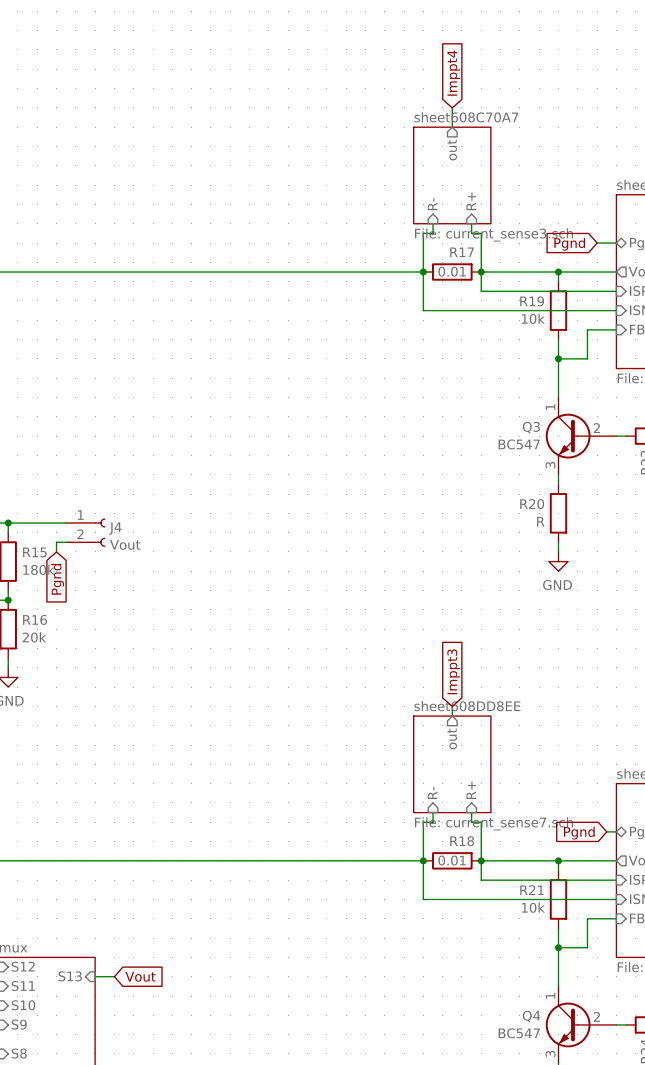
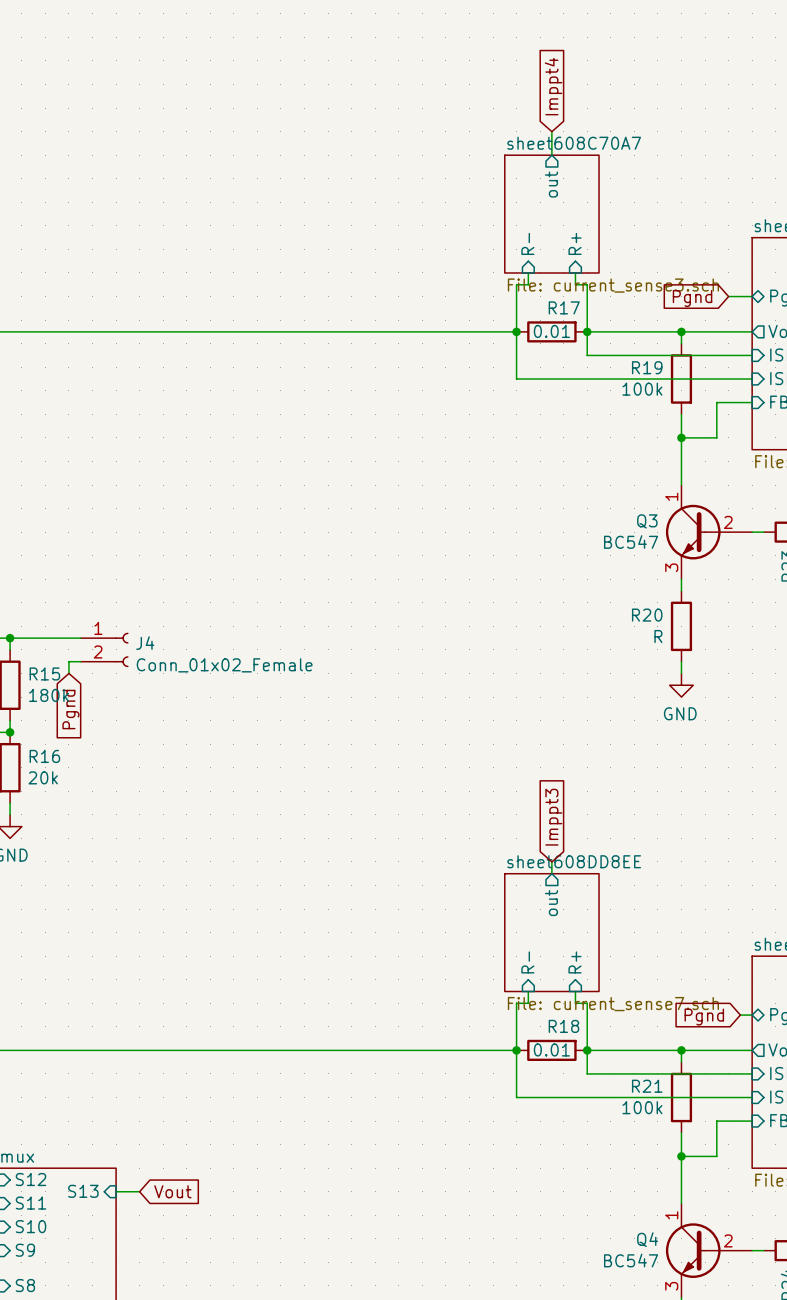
R19 value: 10k (533, 318) -> 100k (642, 389)
J4 value: Vout (125, 544) -> Conn_01x02_Female (224, 665)
R21 value: 10k (533, 907) -> 100k (642, 1107)

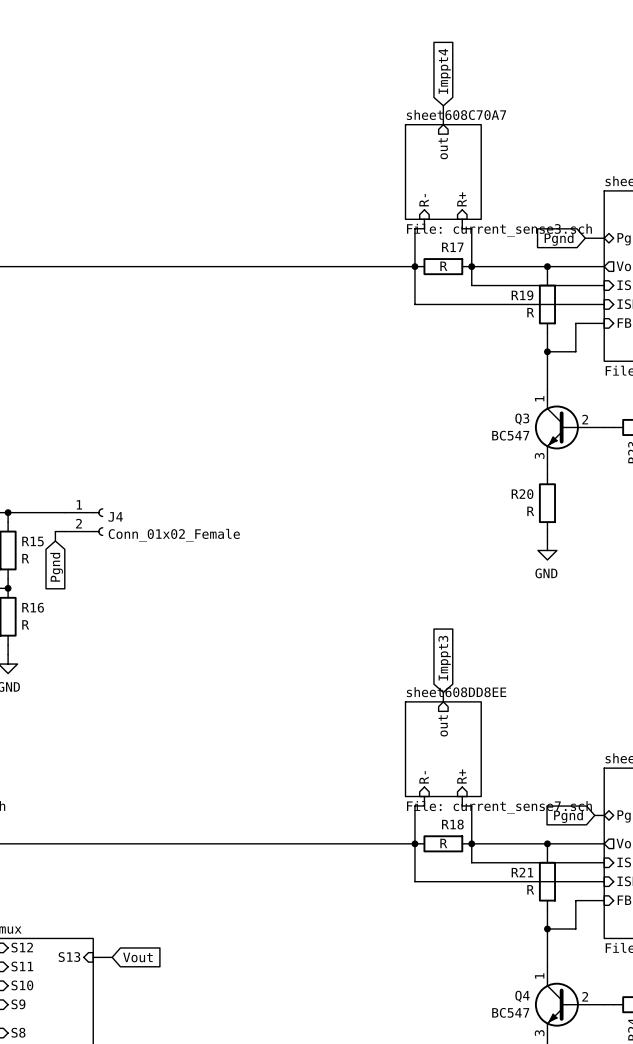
R17 value: 0.01 (551, 331) -> R (443, 266)
R19 value: 100k (642, 389) -> R (530, 312)
R15 value: 180k (49, 695) -> R (25, 558)
R16 value: 20k (43, 777) -> R (25, 624)
R18 value: 0.01 (551, 1049) -> R (443, 843)
R21 value: 100k (642, 1107) -> R (530, 889)

